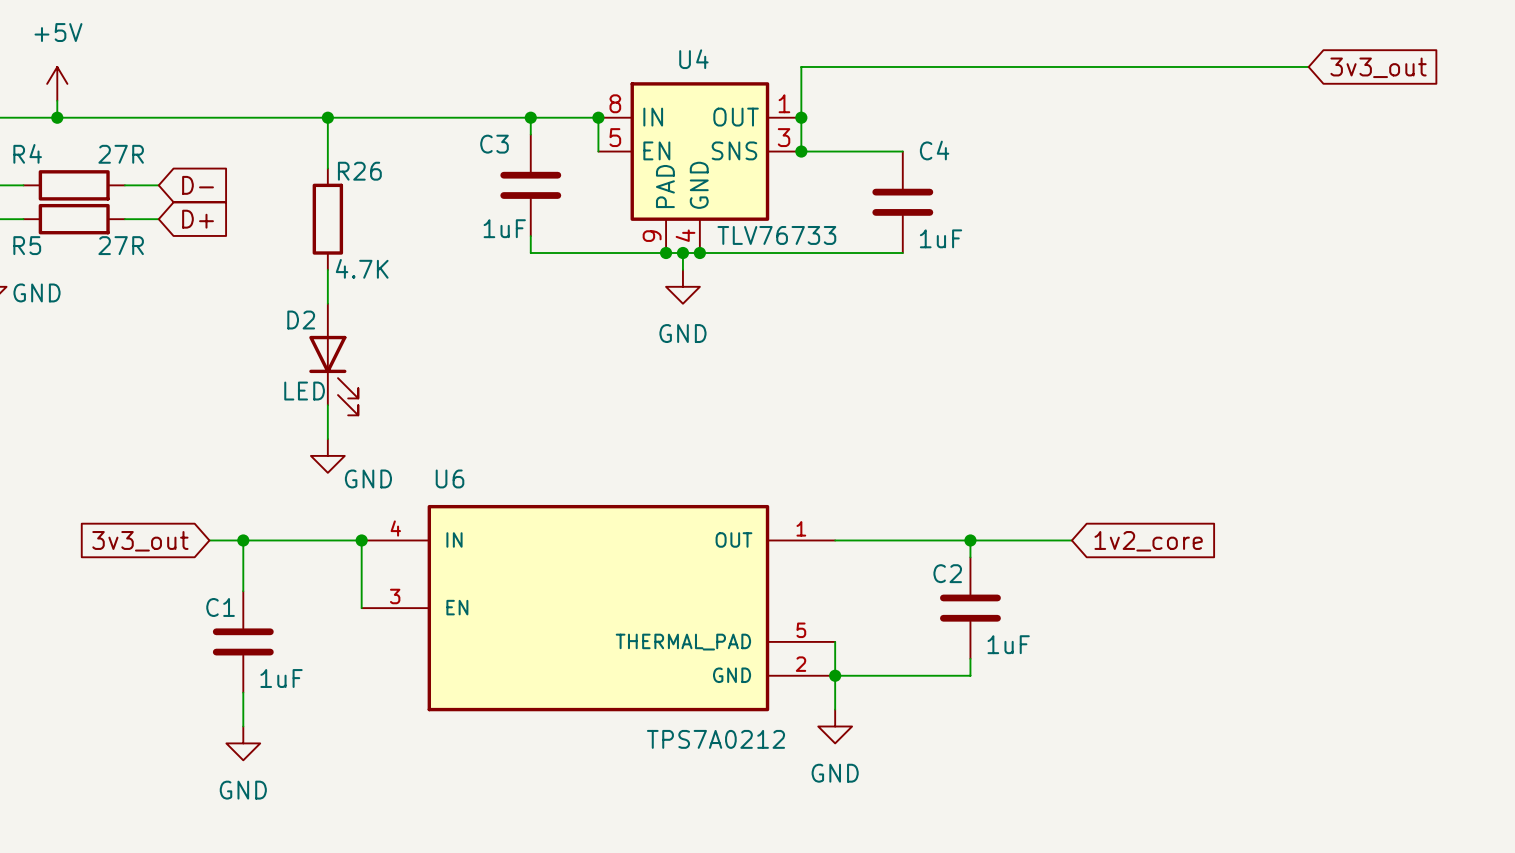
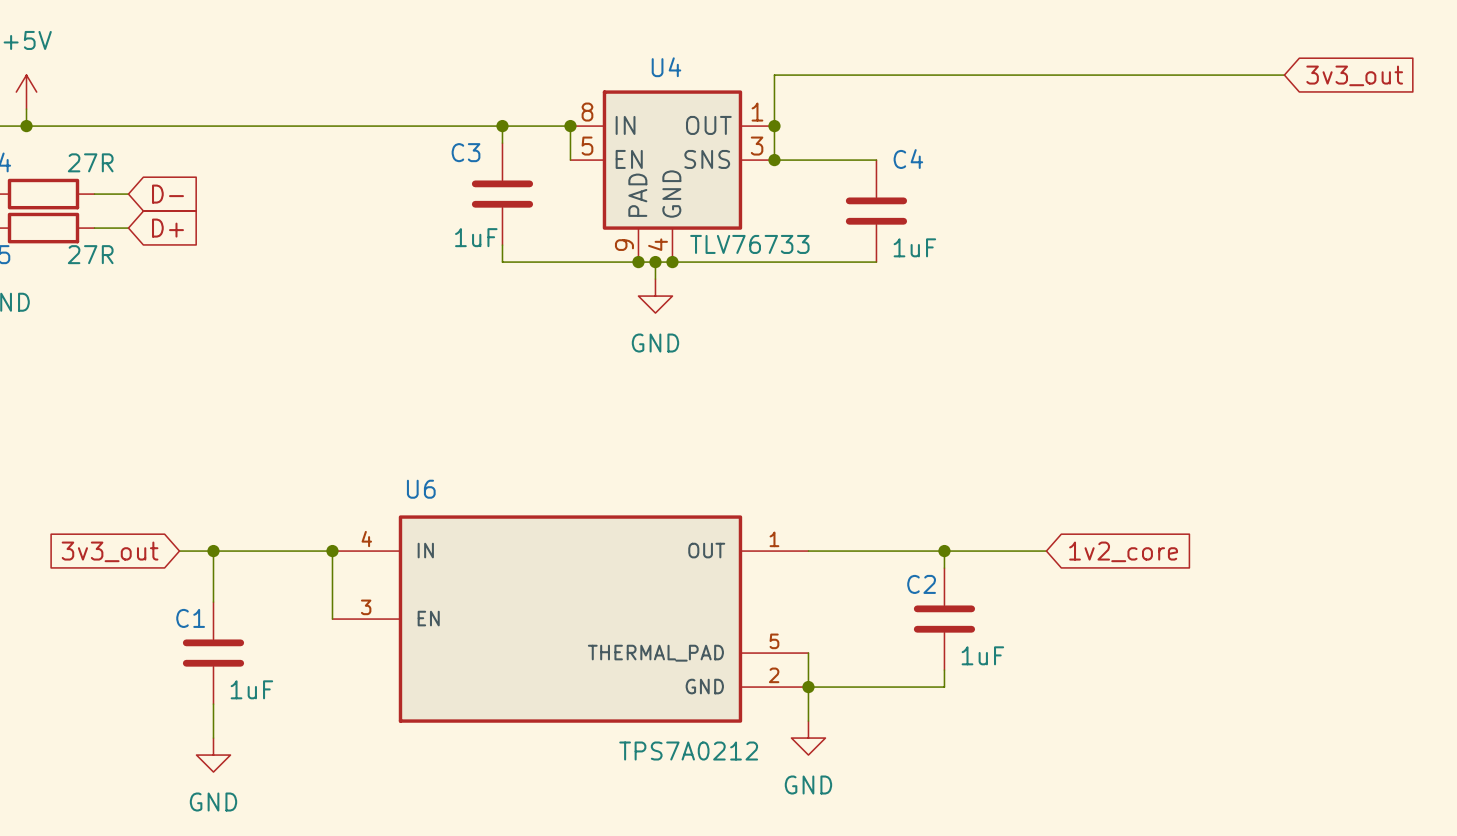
wire: (327, 117) (327, 168) -> none
junction: (327, 117) -> none
R26: 4.7K (327, 219) -> none
wire: (327, 269) (327, 303) -> none
D2: LED (333, 359) -> none
wire: (327, 405) (327, 439) -> none
power symbol: GND (327, 455) -> none

